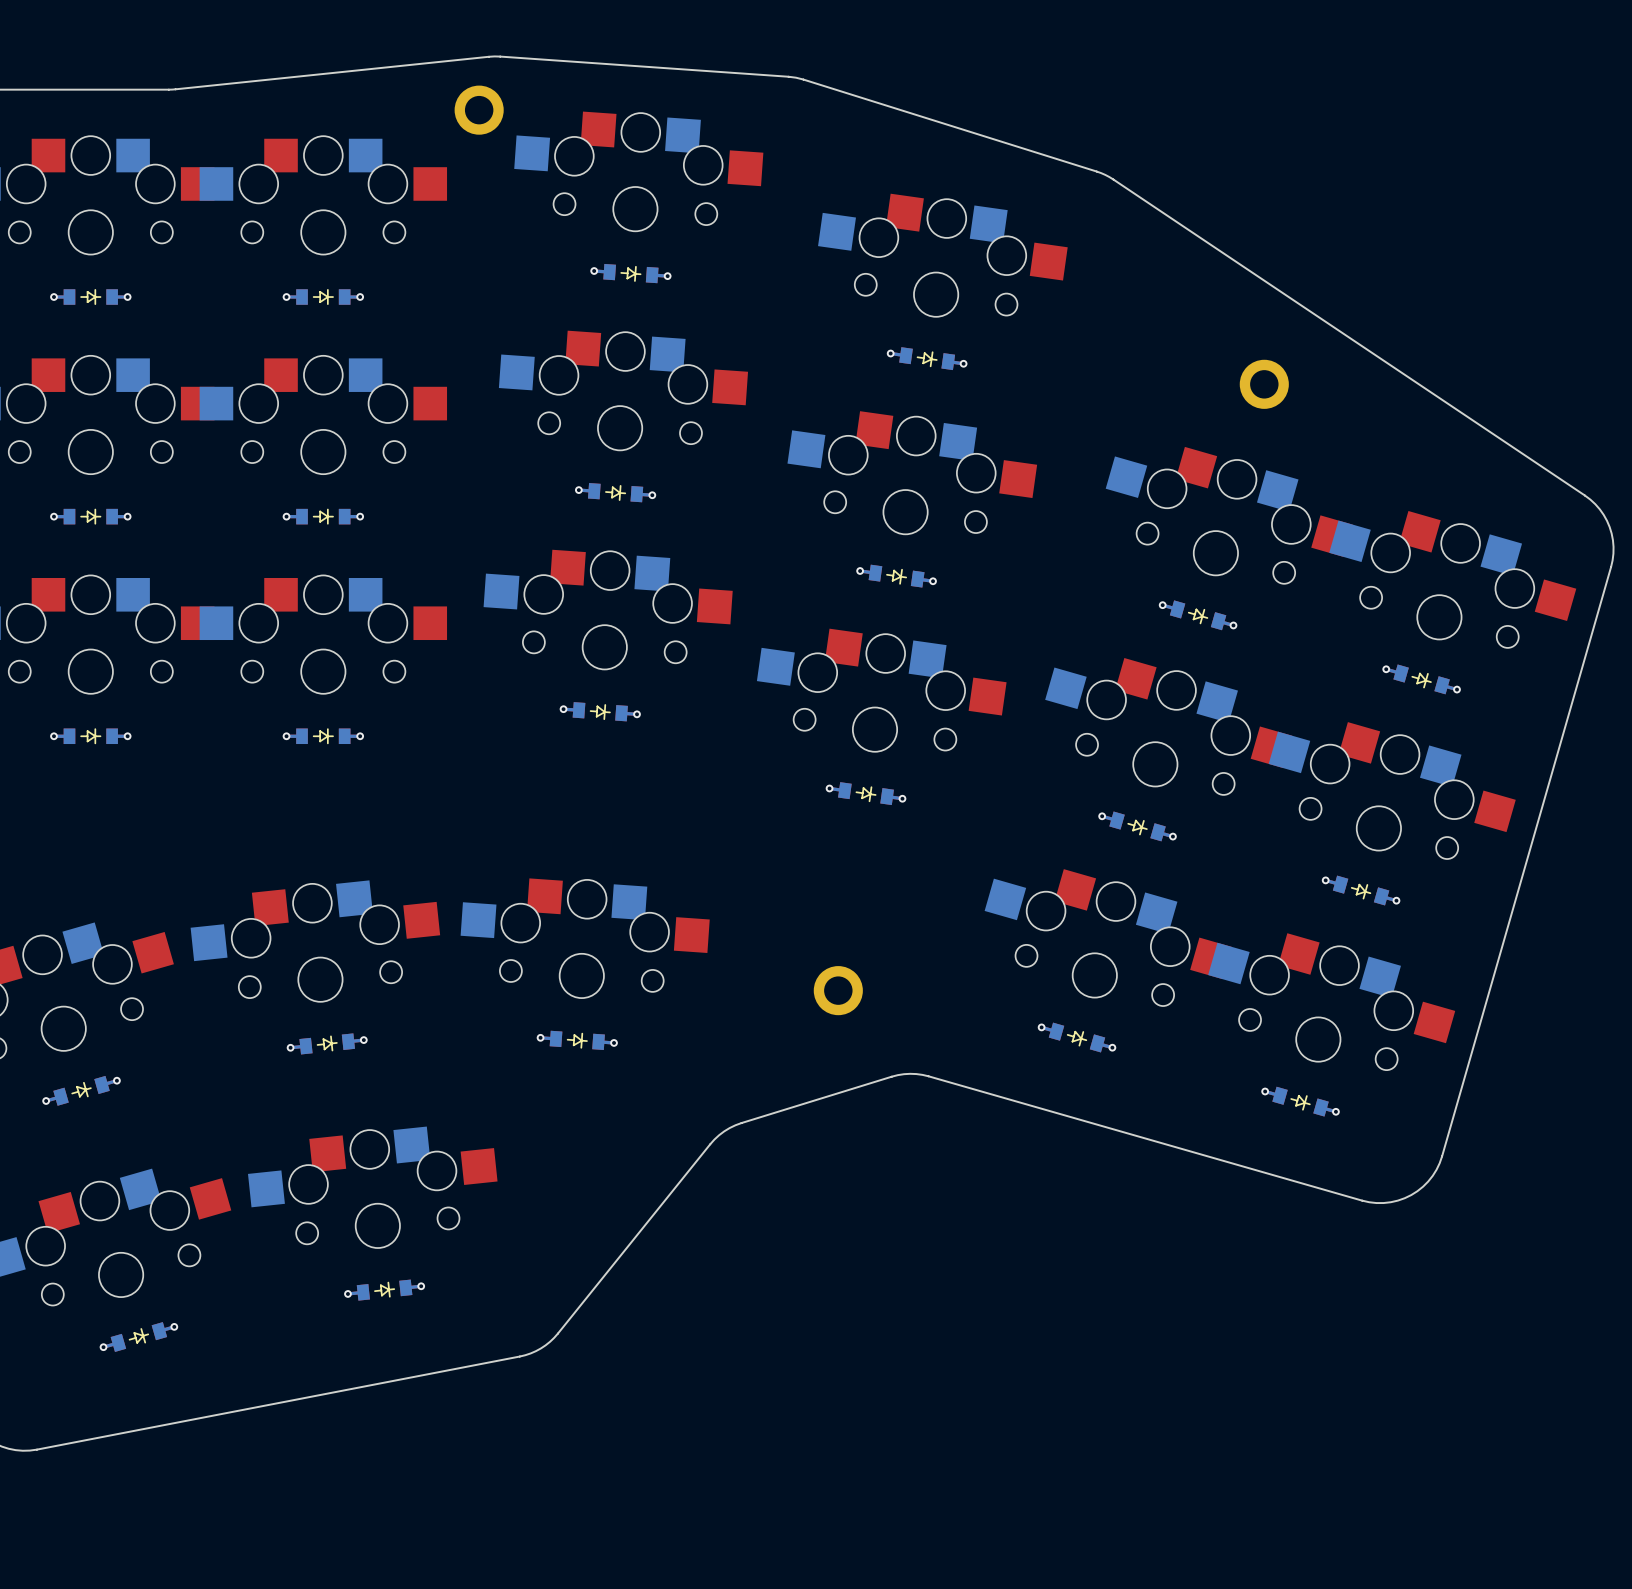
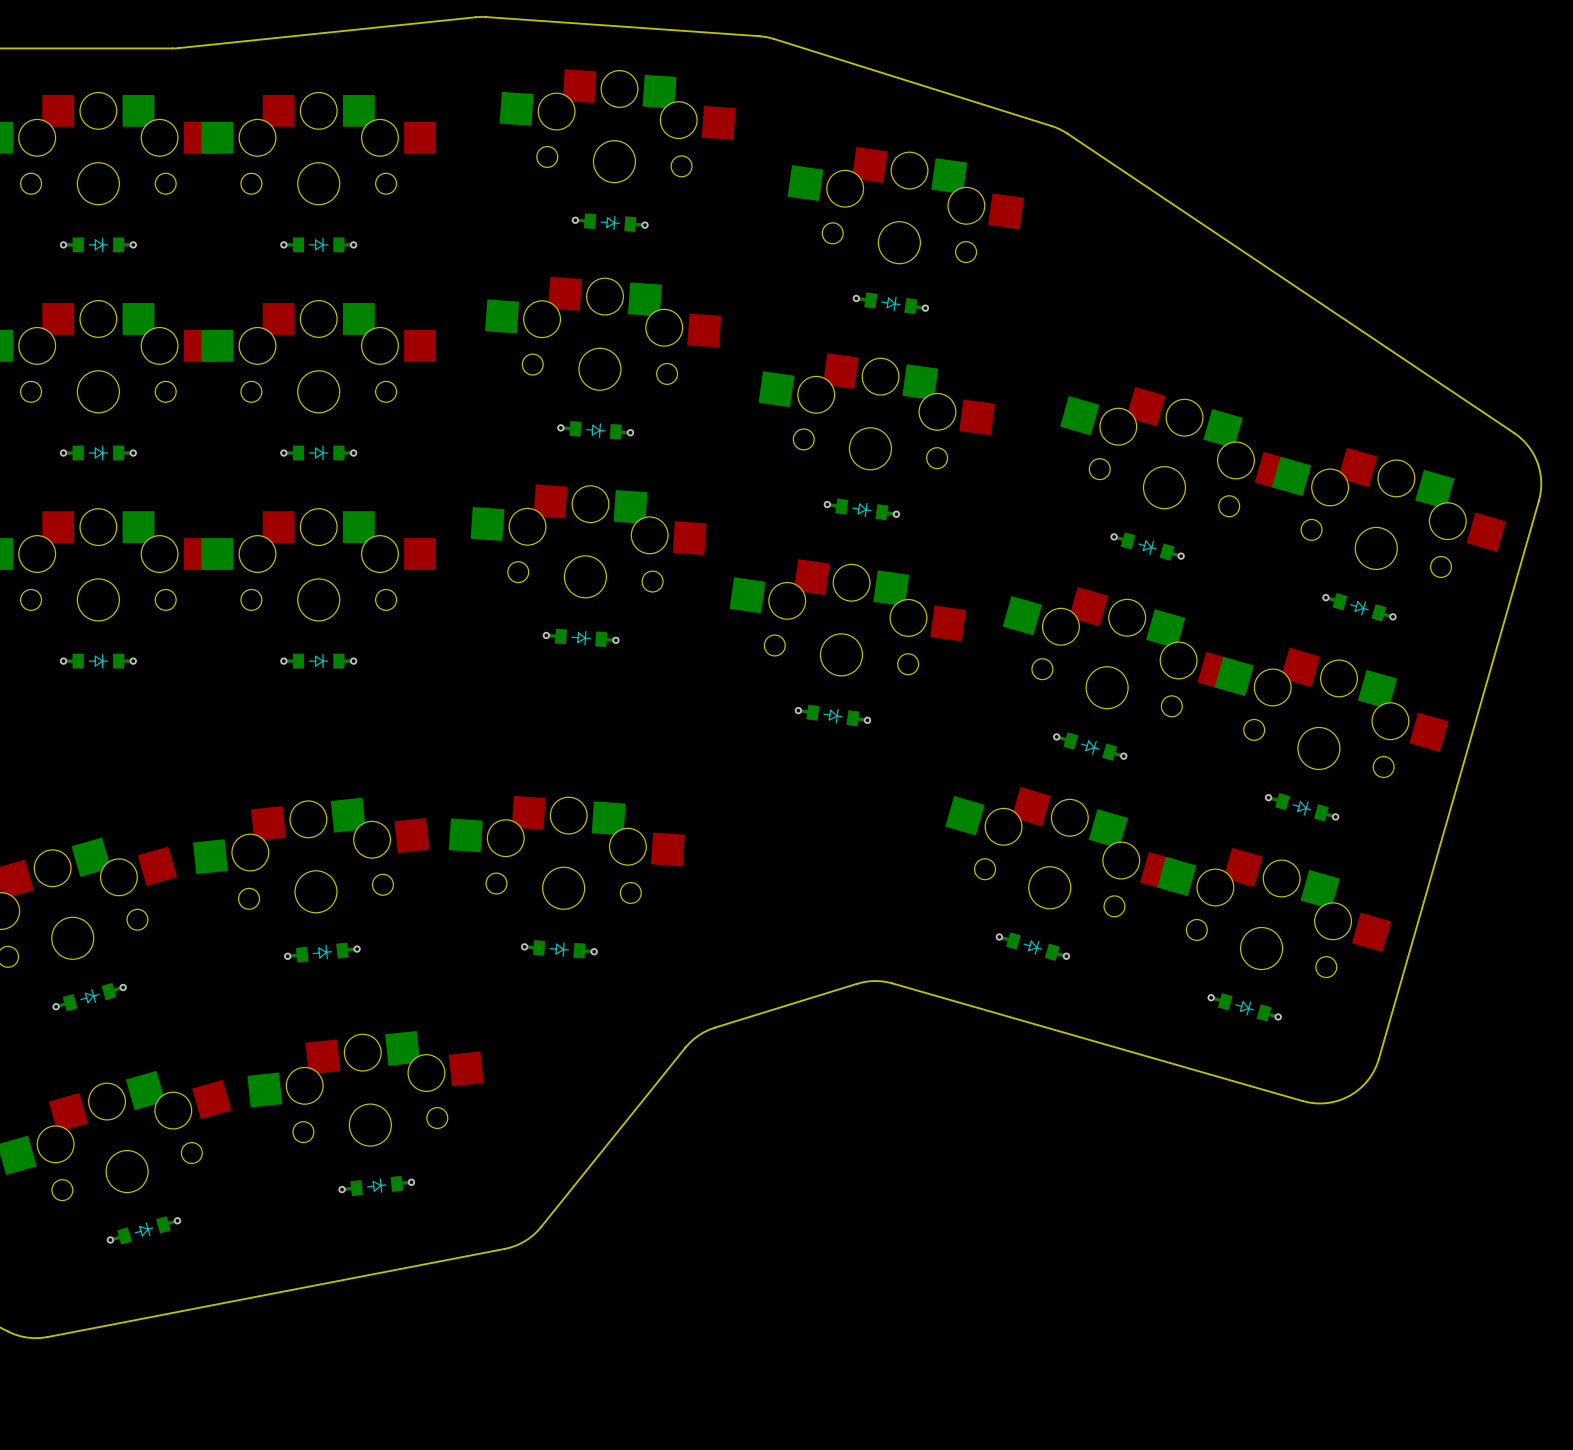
part: (479, 110) -> none
part: (1264, 384) -> none
part: (838, 990) -> none

